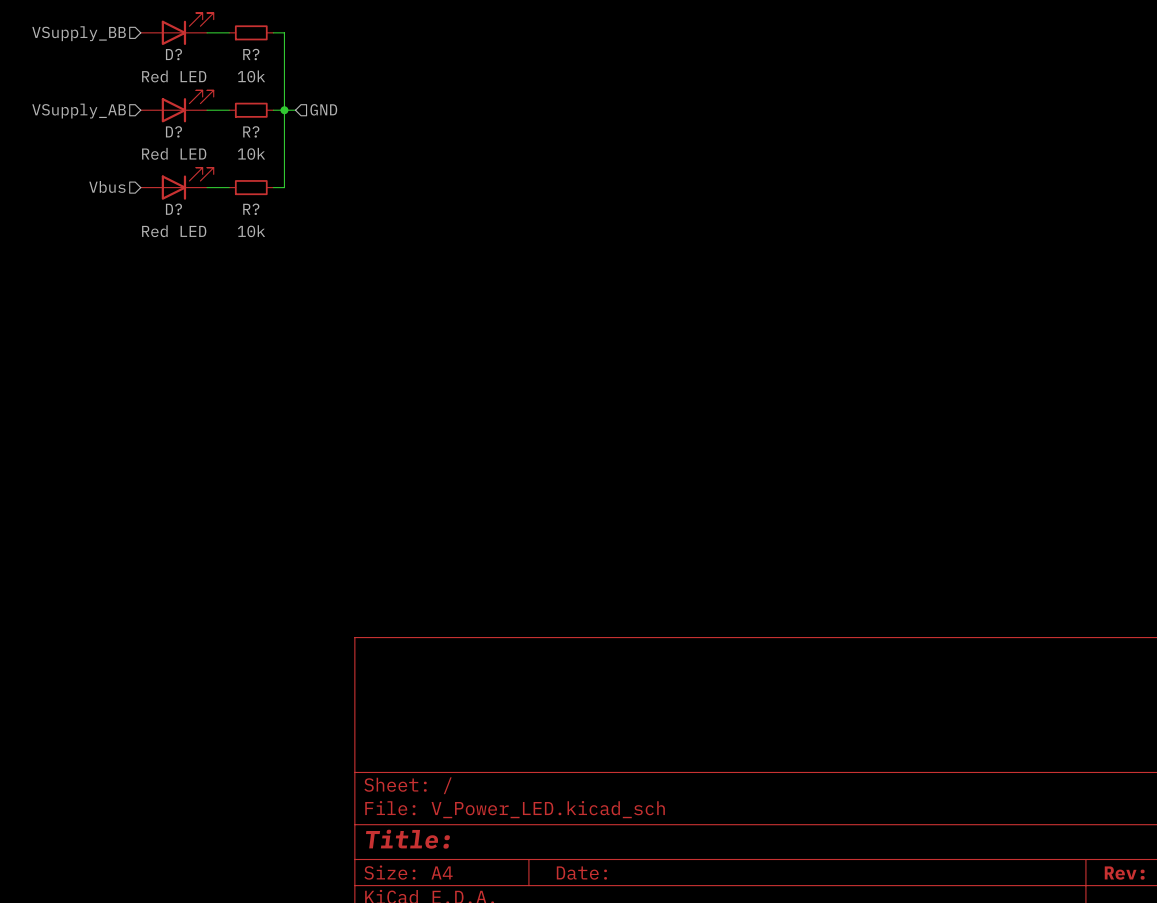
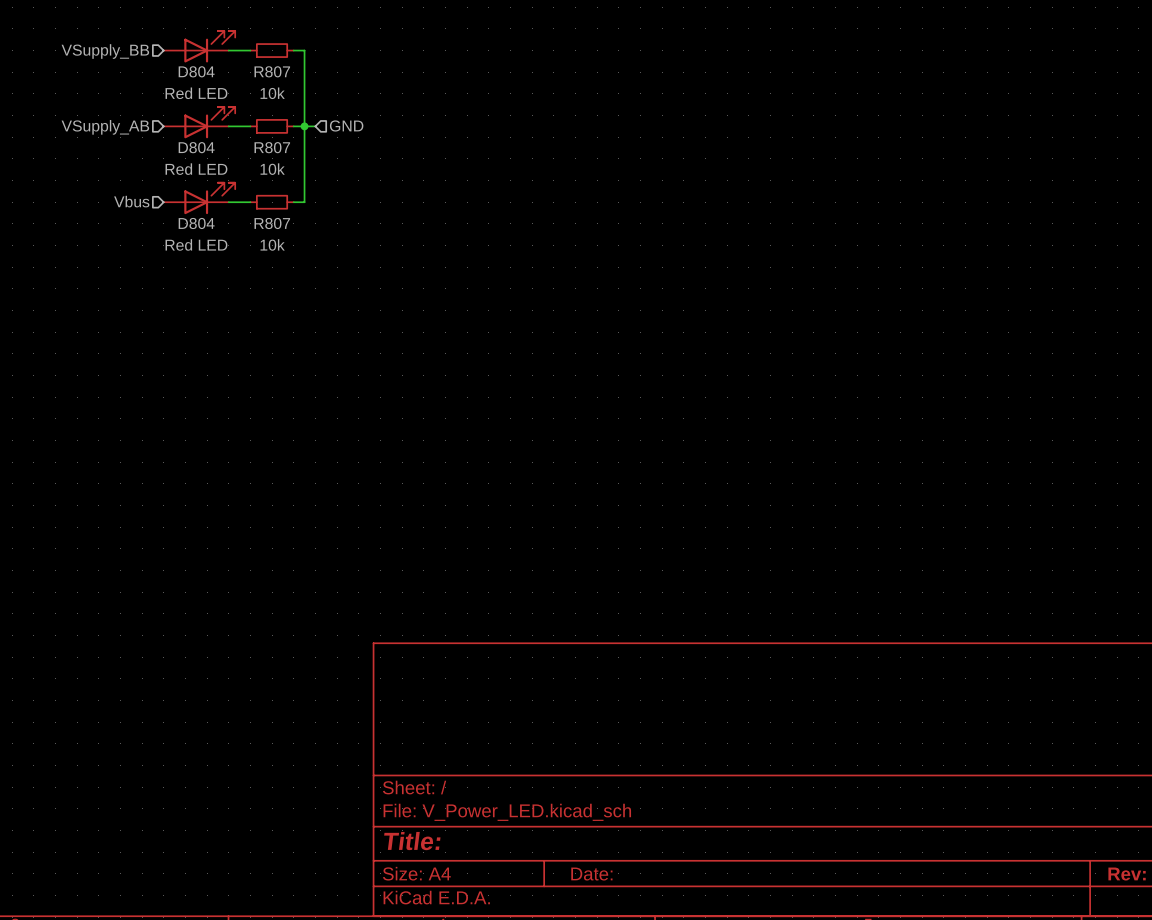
D? name: D? (173, 54) -> D804 (196, 71)
R? name: R? (251, 54) -> R807 (272, 71)
D? name: D? (173, 131) -> D804 (196, 147)
R? name: R? (251, 131) -> R807 (272, 147)
D? name: D? (173, 209) -> D804 (196, 223)
R? name: R? (251, 209) -> R807 (272, 223)

